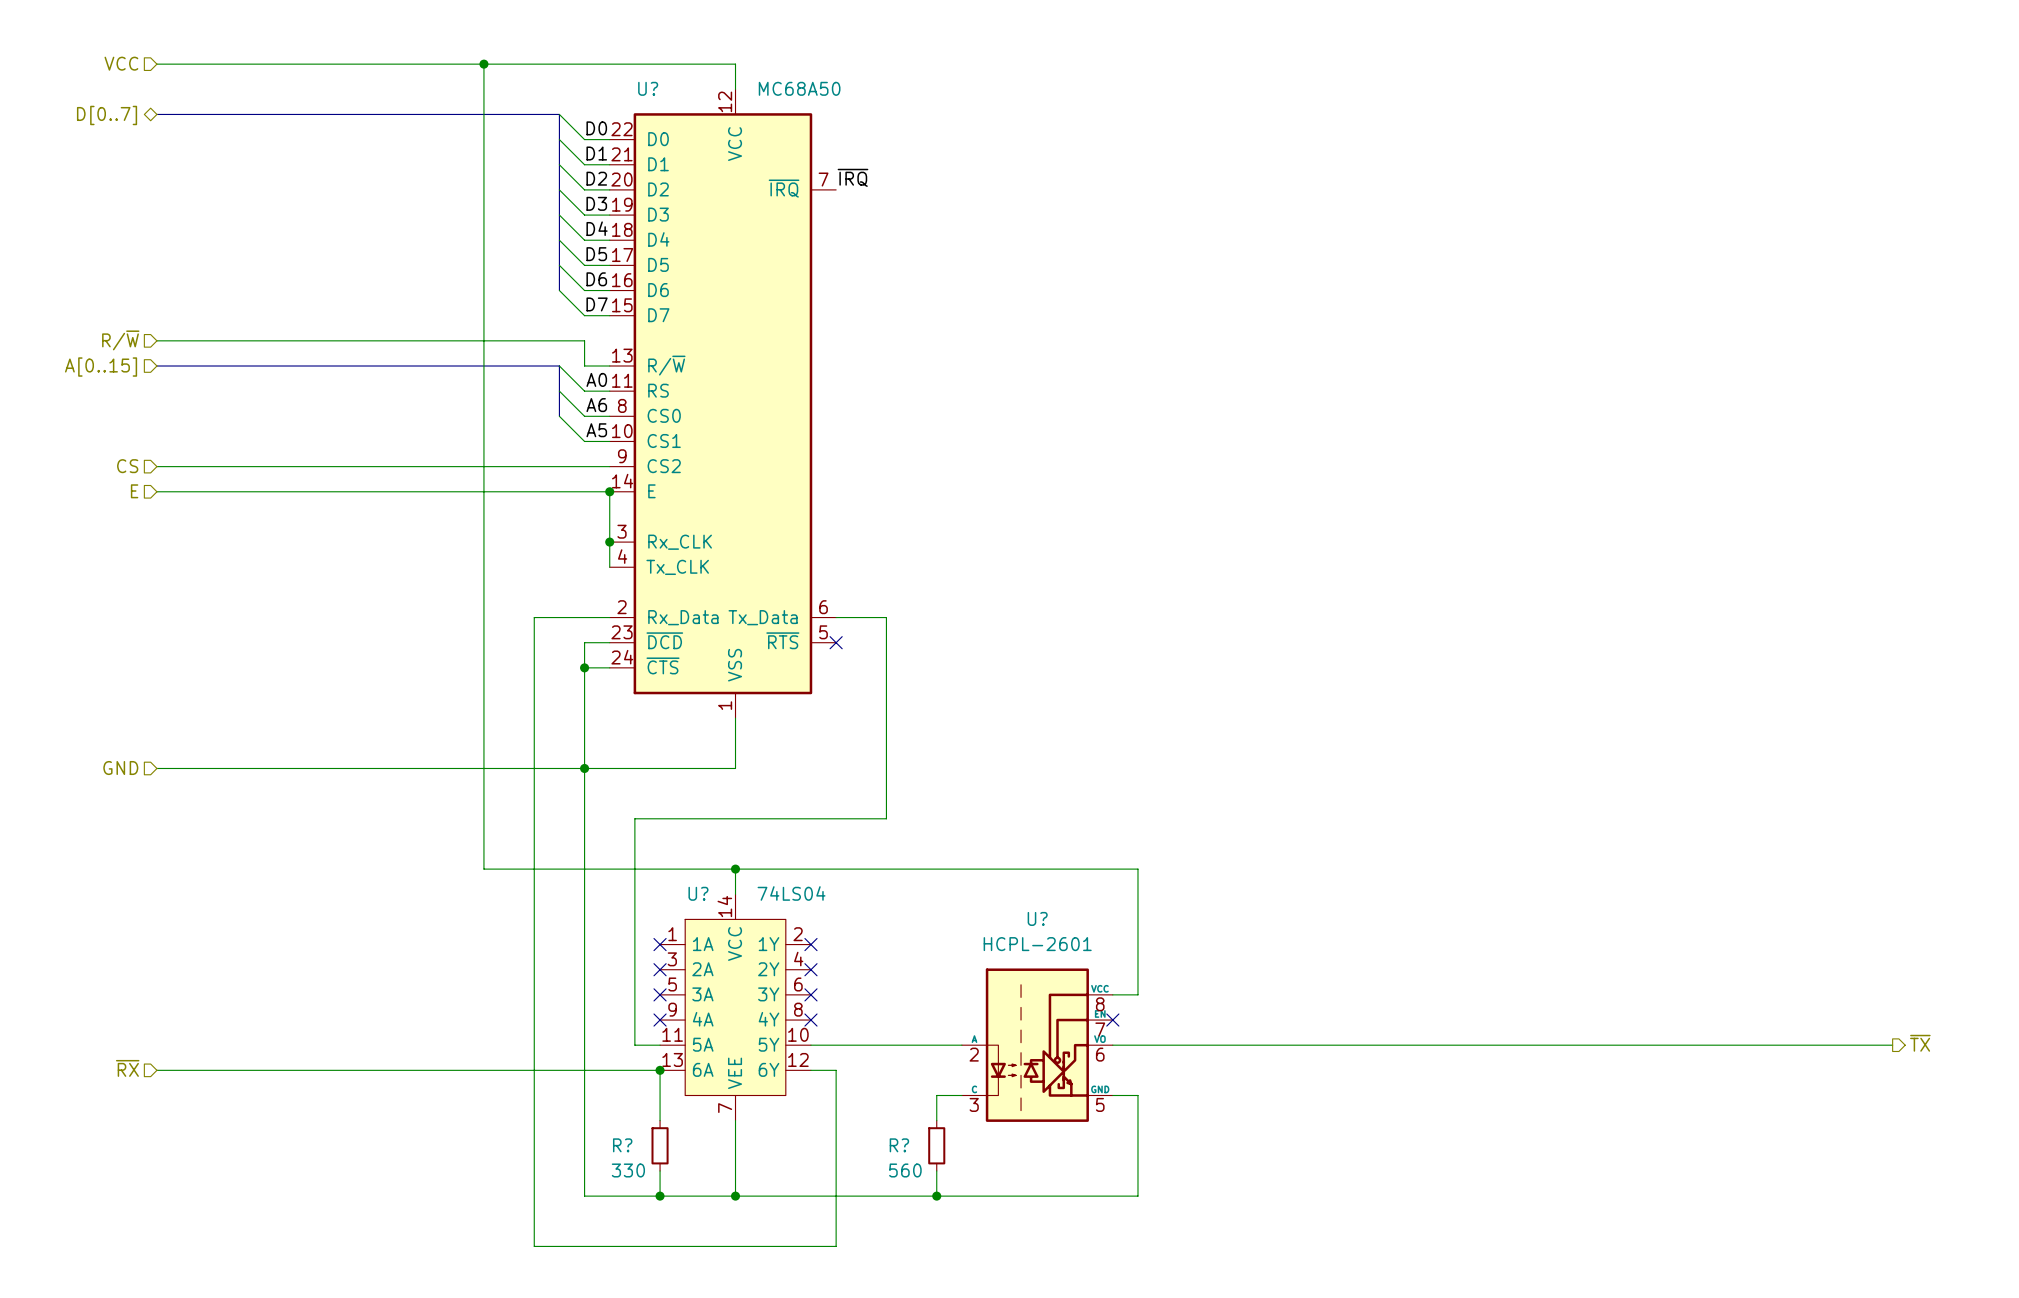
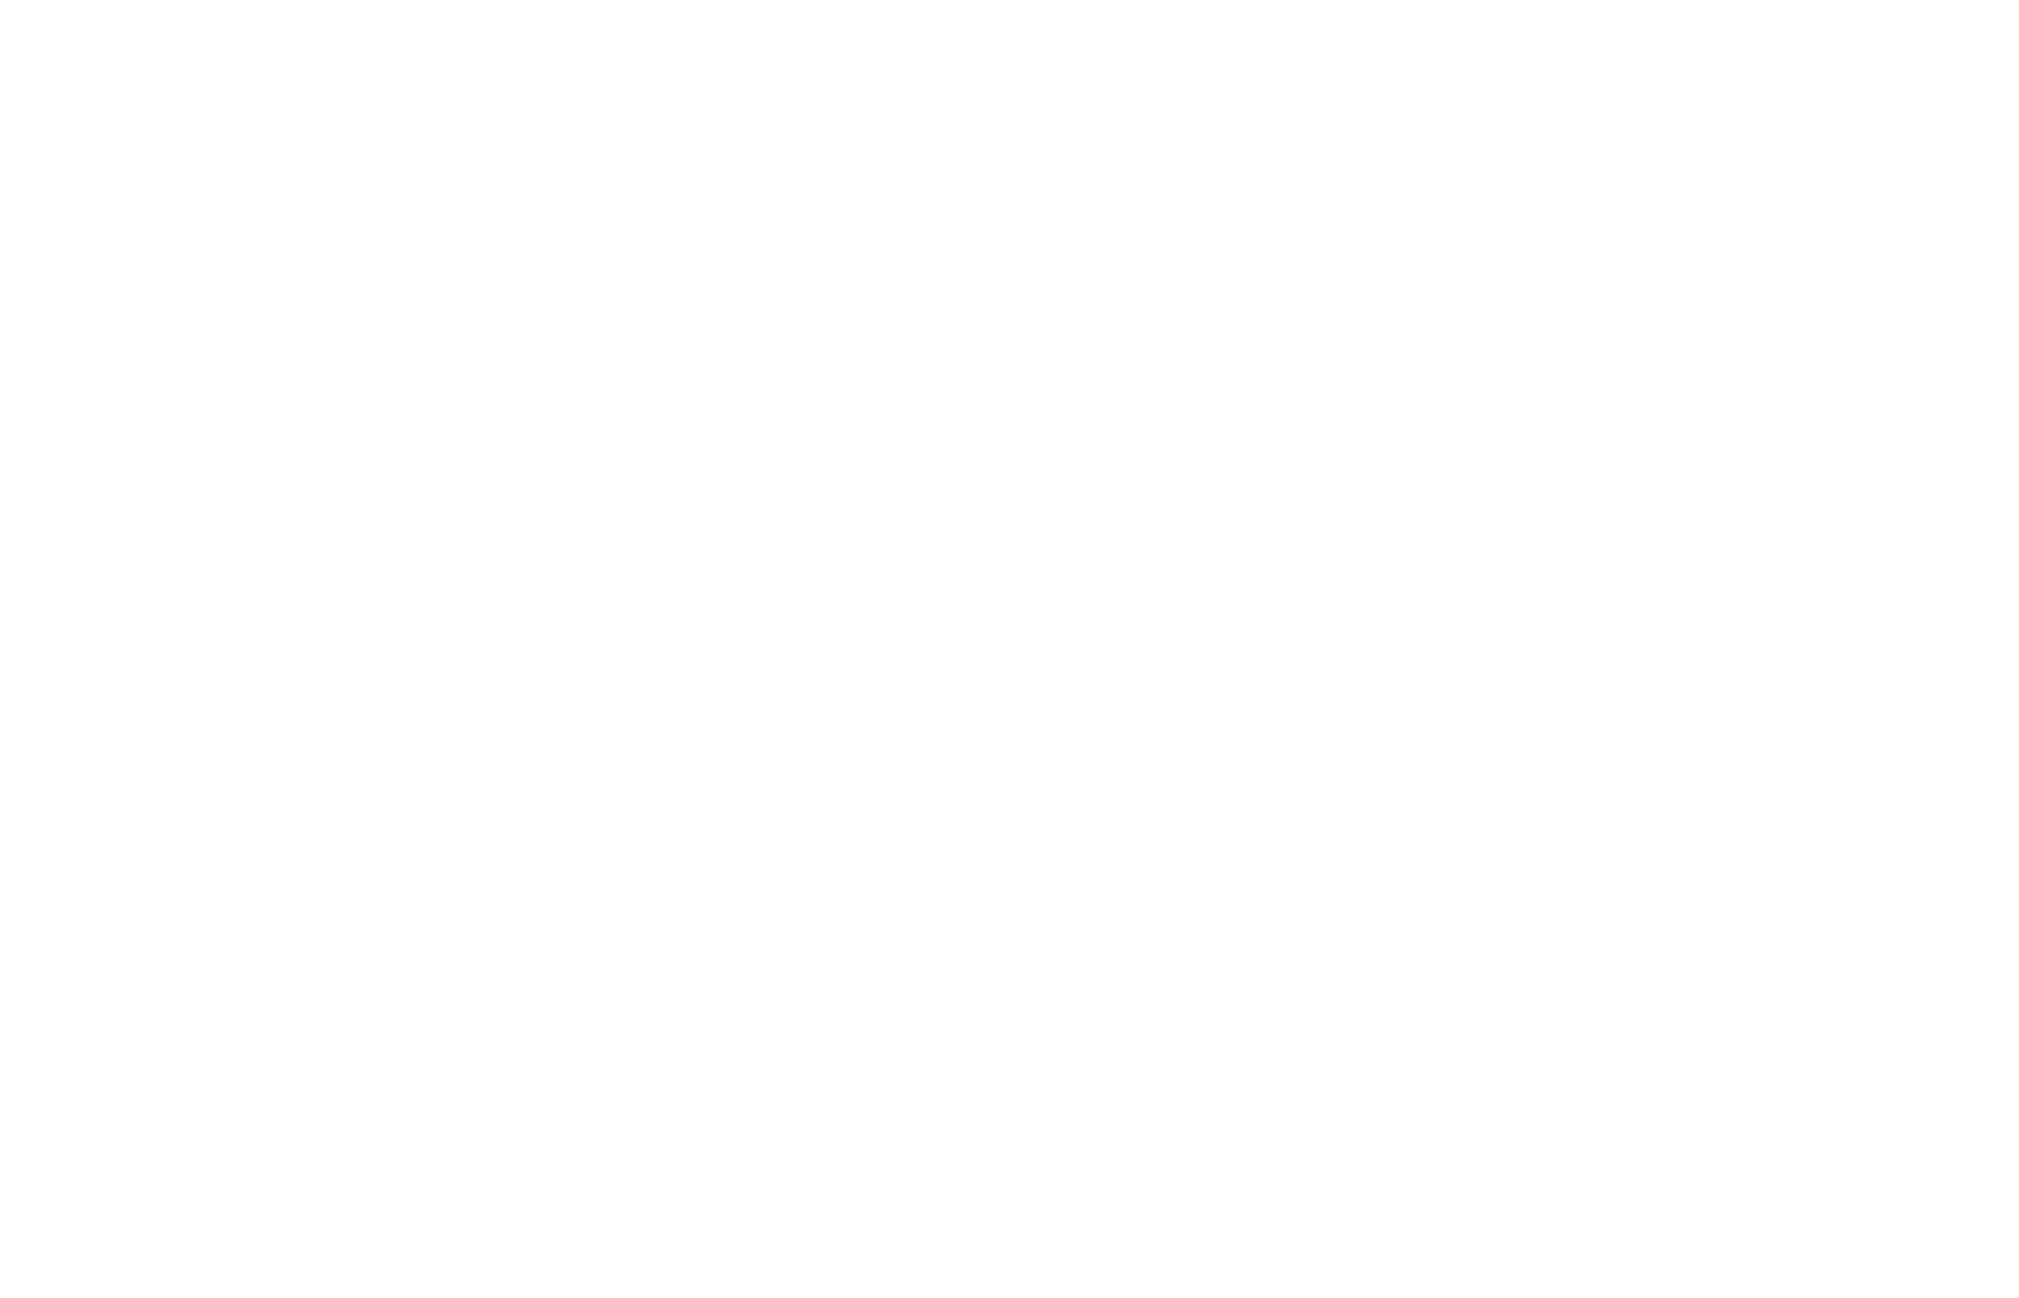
hierarchical label: VCC (121, 63) -> none
wire: (156, 64) (735, 64) (735, 89) -> none
wire: (483, 64) (483, 869) (1137, 869) (1137, 994) (1112, 994) -> none
junction: (483, 64) -> none
bus: (156, 114) (559, 114) (559, 290) -> none
wire: (559, 114) (584, 139) (609, 139) -> none
hierarchical label: D[0..7] (107, 115) -> none
label: D0 (596, 128) -> none
wire: (559, 139) (584, 164) (609, 164) -> none
label: D1 (596, 153) -> none
wire: (559, 164) (584, 189) (609, 189) -> none
label: ~{IRQ} (852, 177) -> none
label: D2 (596, 178) -> none
wire: (559, 189) (584, 215) (609, 215) -> none
label: D3 (596, 203) -> none
wire: (559, 215) (584, 240) (609, 240) -> none
label: D4 (597, 228) -> none
wire: (559, 240) (584, 265) (609, 265) -> none
label: D5 (596, 254) -> none
wire: (559, 265) (584, 290) (609, 290) -> none
label: D6 (596, 279) -> none
wire: (559, 290) (584, 315) (609, 315) -> none
label: D7 (597, 304) -> none
hierarchical label: R/~{W} (120, 340) -> none
wire: (156, 340) (584, 340) (584, 366) (609, 366) -> none
bus: (156, 366) (559, 366) (559, 416) -> none
wire: (559, 366) (584, 391) (609, 391) -> none
hierarchical label: A[0..15] (101, 367) -> none
label: A0 (596, 379) -> none
wire: (559, 391) (584, 416) (609, 416) -> none
U?: MC68A50 (722, 403) -> none
label: A6 (596, 405) -> none
wire: (559, 416) (584, 441) (609, 441) -> none
label: A5 (596, 430) -> none
hierarchical label: CS (127, 466) -> none
wire: (156, 466) (609, 466) -> none
hierarchical label: E (134, 491) -> none
wire: (156, 491) (609, 491) (609, 567) -> none
junction: (609, 491) -> none
junction: (609, 542) -> none
wire: (609, 617) (534, 617) (534, 1246) (836, 1246) (836, 1070) (810, 1070) -> none
wire: (836, 617) (886, 617) (886, 818) (634, 818) (634, 1045) (660, 1045) -> none
wire: (609, 642) (584, 642) (584, 1196) (1137, 1196) (1137, 1095) (1112, 1095) -> none
no-connect mark: (836, 642) -> none
wire: (584, 667) (609, 667) -> none
junction: (584, 667) -> none
wire: (735, 718) (735, 768) (156, 768) -> none
hierarchical label: GND (120, 768) -> none
junction: (584, 768) -> none
wire: (735, 869) (735, 894) -> none
junction: (735, 869) -> none
no-connect mark: (660, 944) -> none
no-connect mark: (810, 944) -> none
no-connect mark: (660, 969) -> none
no-connect mark: (810, 969) -> none
no-connect mark: (660, 994) -> none
no-connect mark: (810, 994) -> none
U?: 74LS04 (735, 1007) -> none
no-connect mark: (660, 1020) -> none
no-connect mark: (810, 1020) -> none
no-connect mark: (1112, 1020) -> none
hierarchical label: ~{TX} (1920, 1043) -> none
wire: (810, 1045) (961, 1045) -> none
U?: HCPL-2601 (1037, 1045) -> none
wire: (1112, 1045) (1892, 1045) -> none
hierarchical label: ~{RX} (127, 1068) -> none
wire: (156, 1070) (660, 1070) (660, 1120) -> none
junction: (660, 1070) -> none
wire: (961, 1095) (936, 1095) (936, 1120) -> none
wire: (735, 1120) (735, 1196) -> none
R?: 330 (660, 1145) -> none
R?: 560 (936, 1145) -> none
wire: (660, 1170) (660, 1196) -> none
wire: (936, 1170) (936, 1196) -> none
junction: (660, 1196) -> none
junction: (735, 1196) -> none
junction: (936, 1196) -> none

